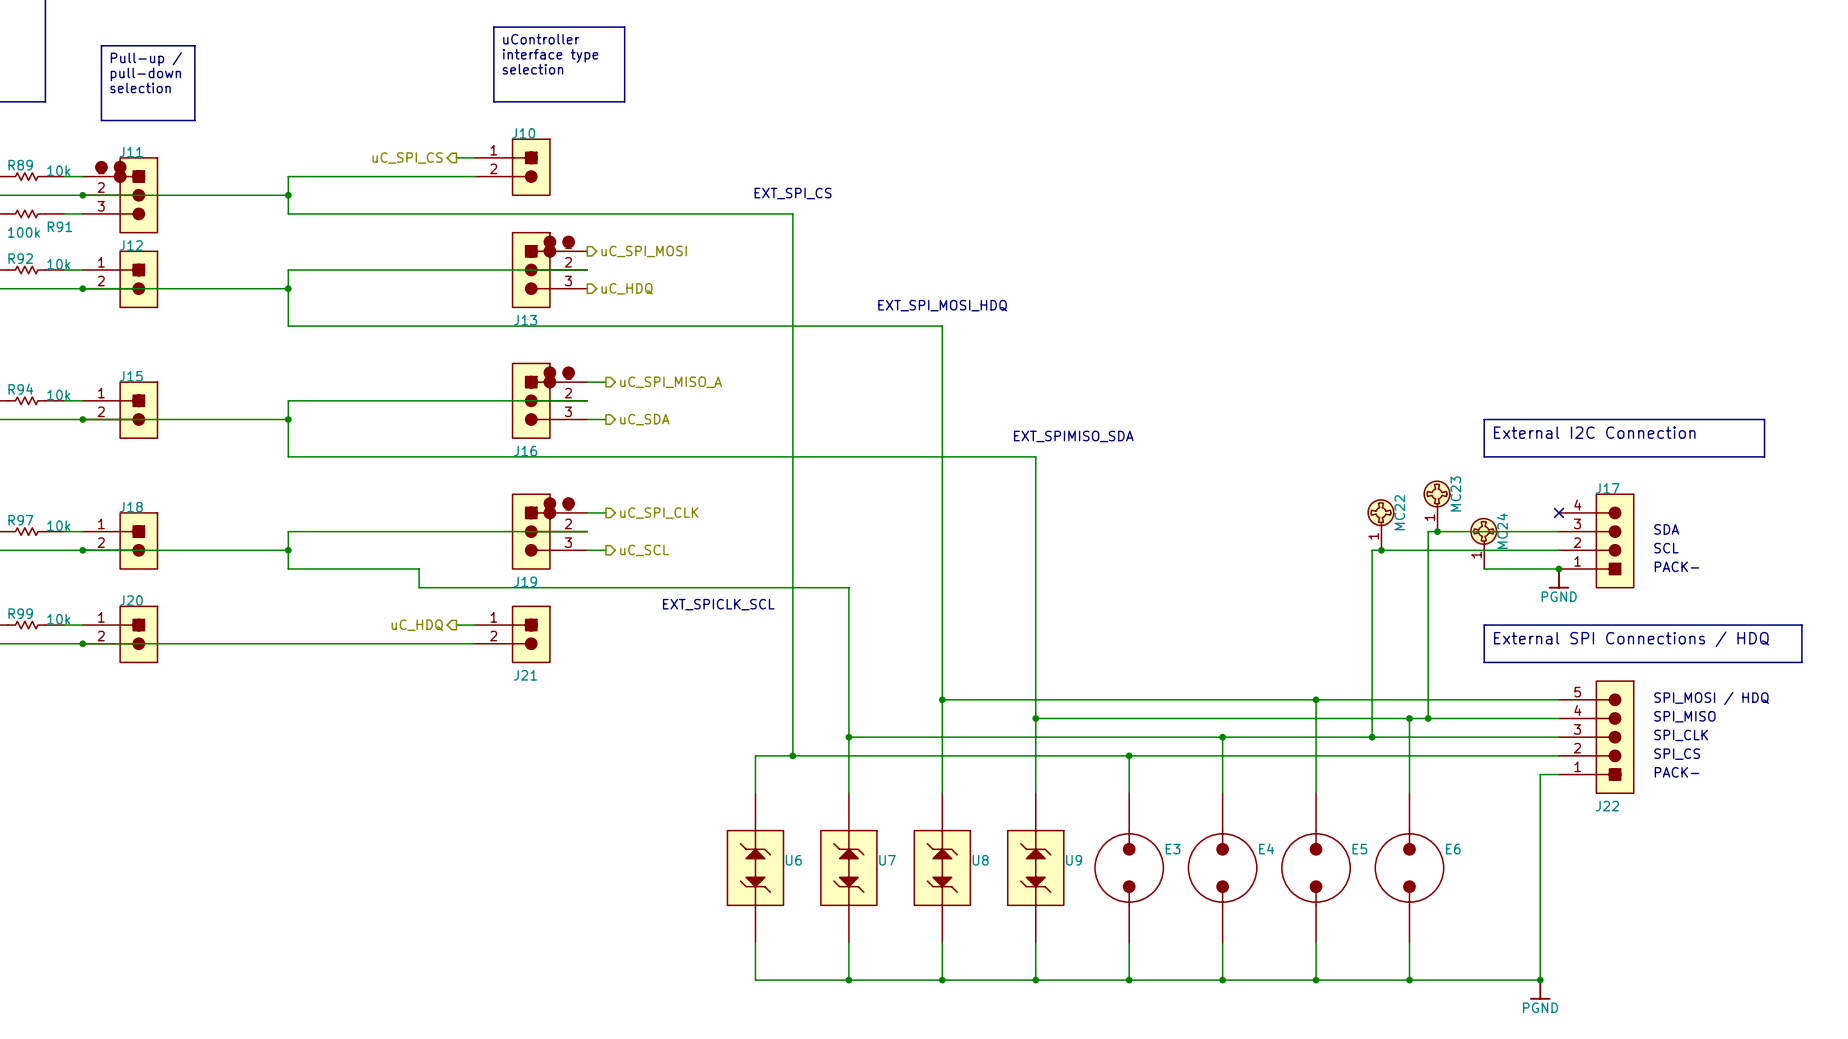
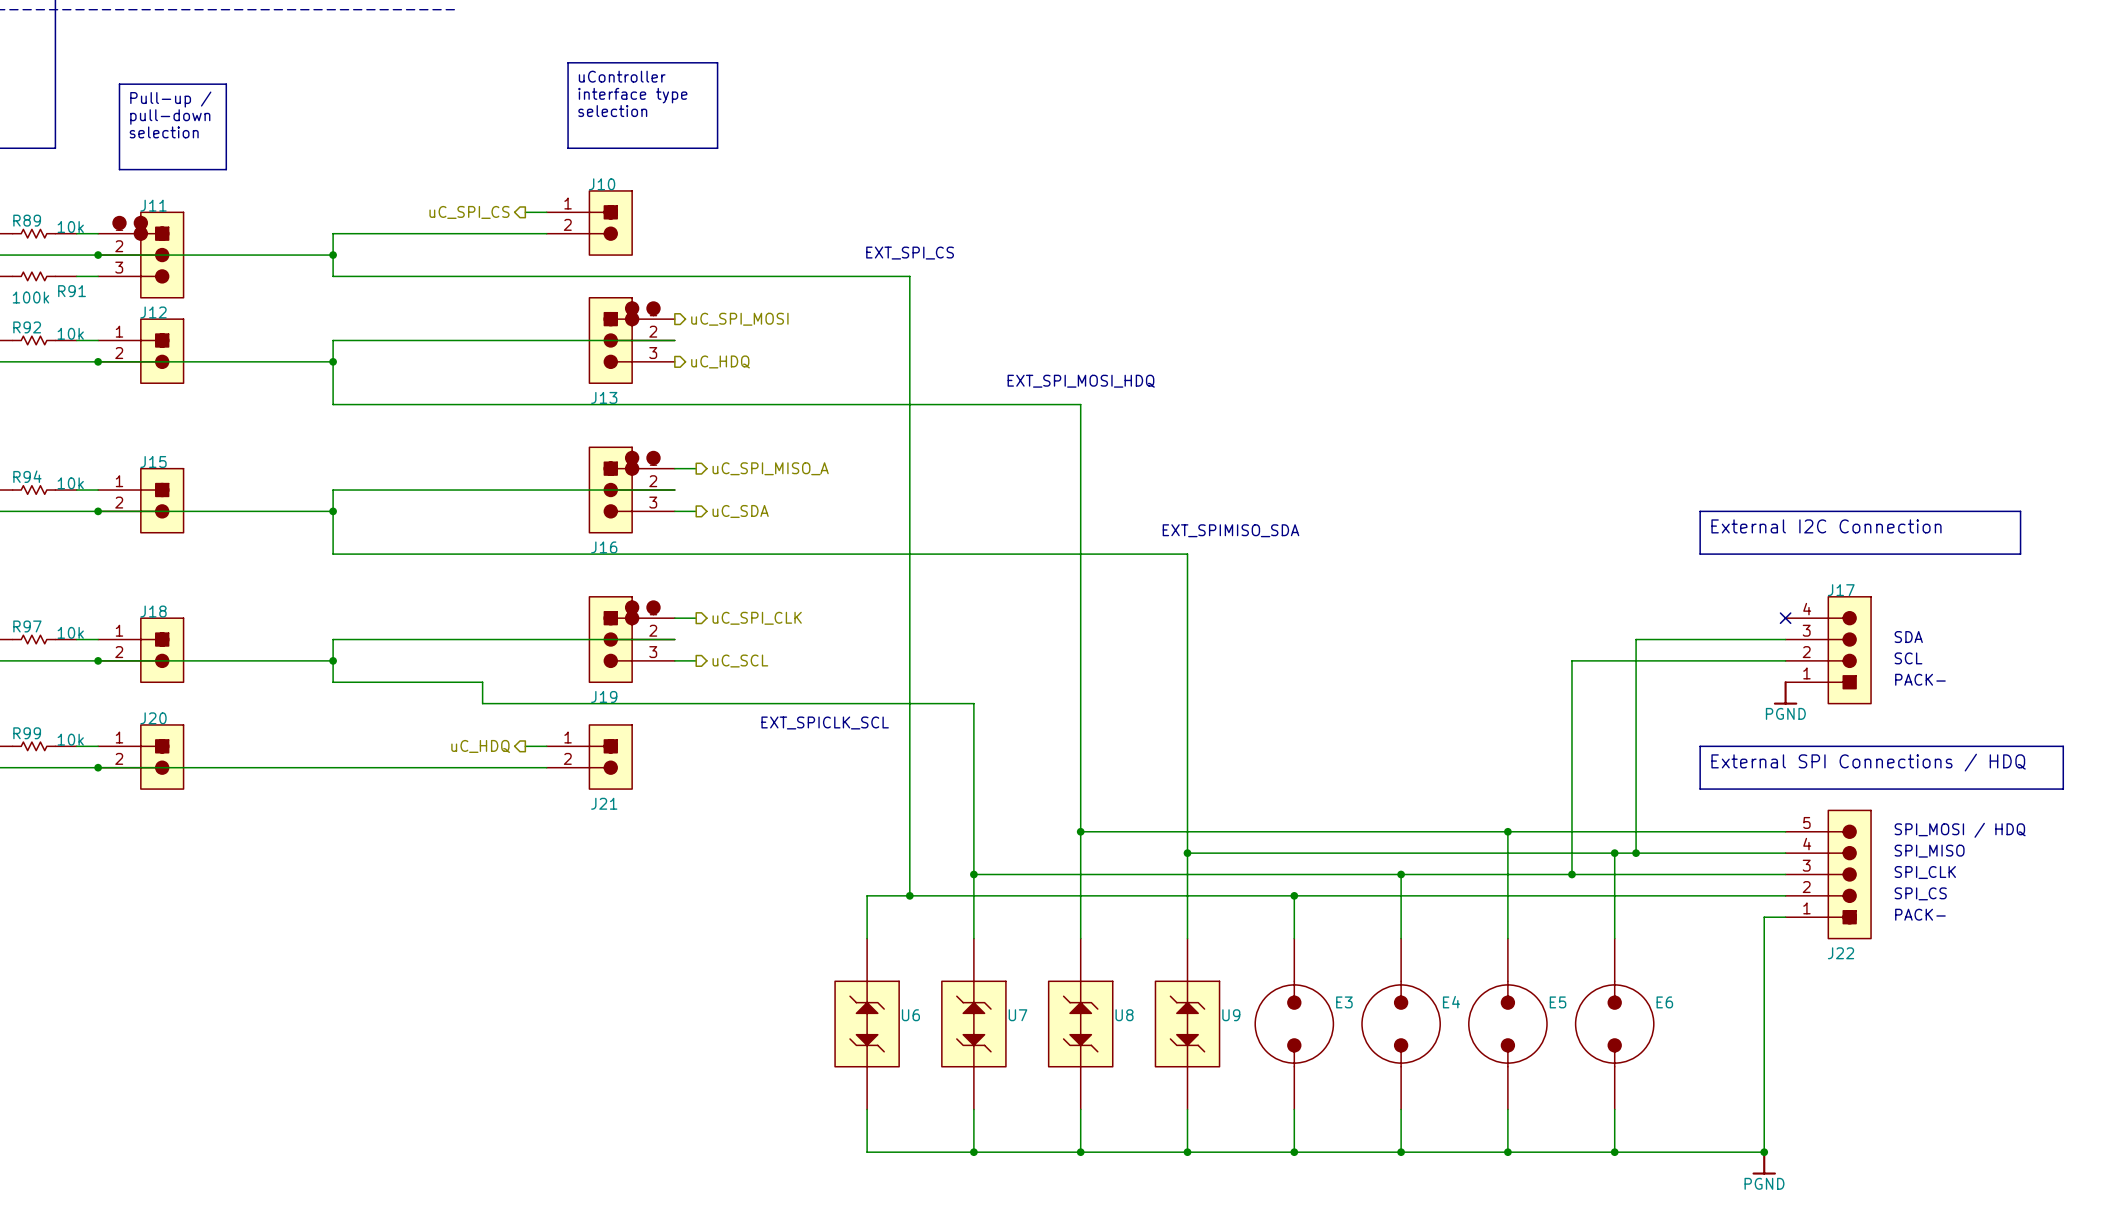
MC23: (1437, 506) -> none
MC22: (1380, 524) -> none
junction: (1437, 531) -> none
MC24: (1483, 543) -> none
junction: (1381, 550) -> none
wire: (1484, 569) (1558, 569) -> none
junction: (1558, 569) -> none

